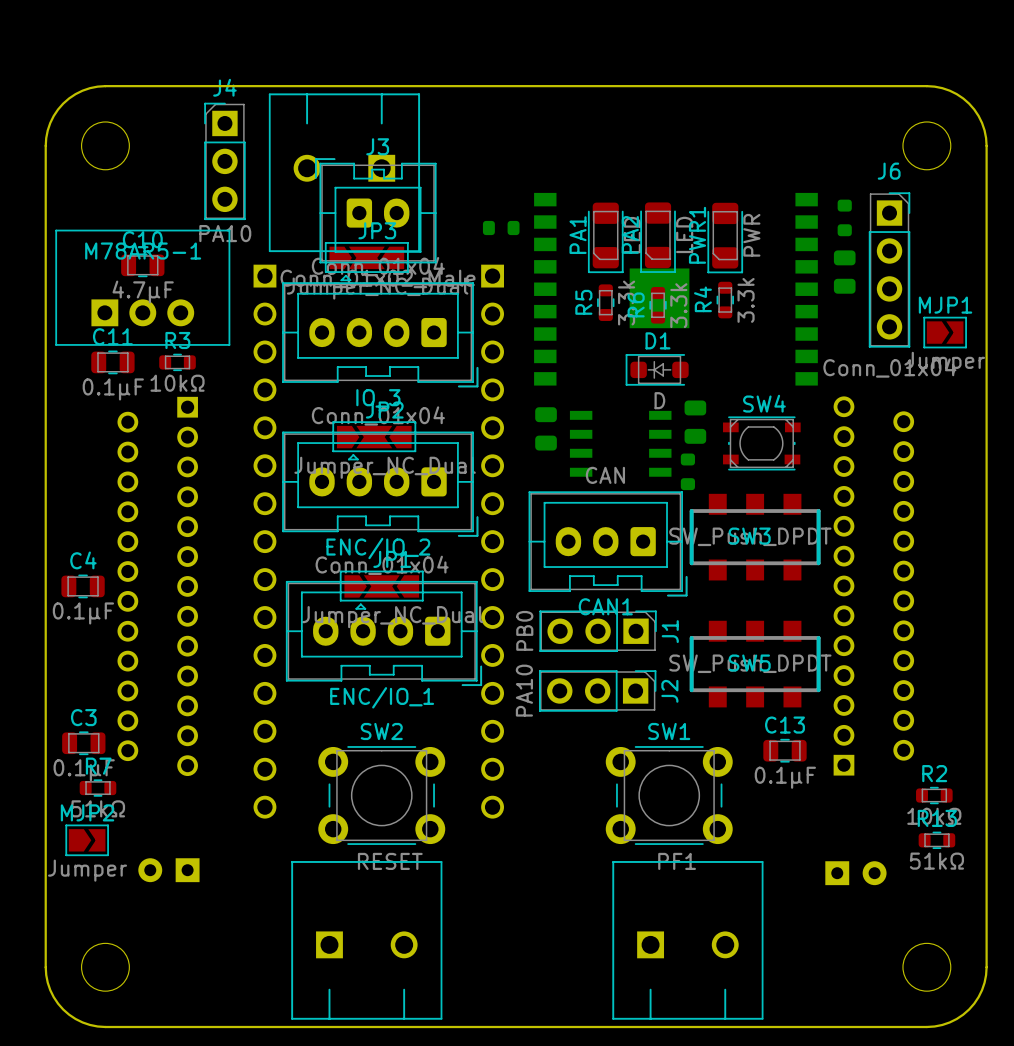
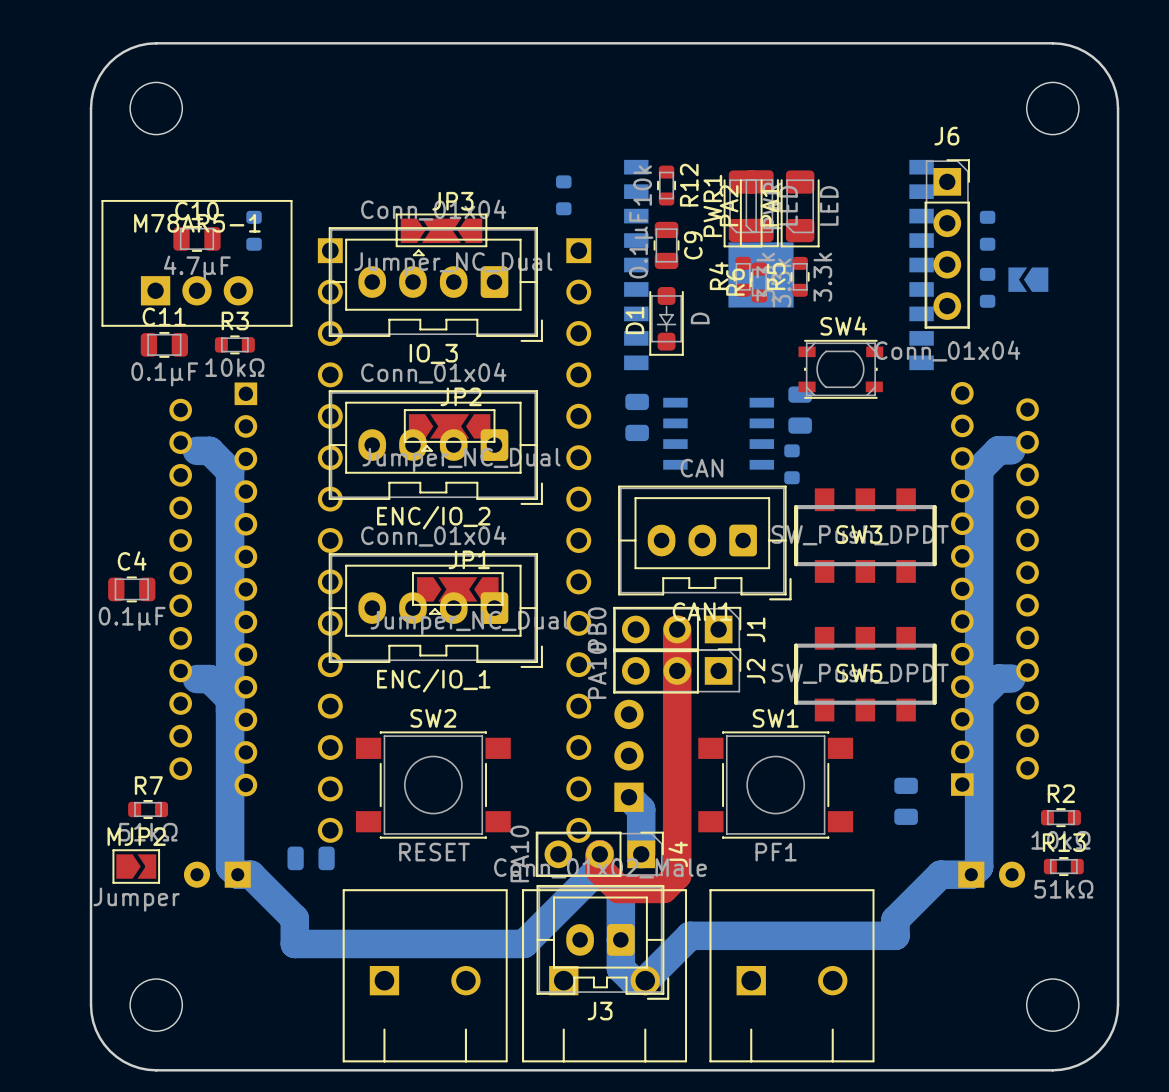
J4 rotation: 0° (224, 161) -> 90° clockwise (599, 854)
J4 position: (224, 161) -> (599, 854)
part: (344, 172) -> none
J3 rotation: 0° (375, 210) -> 180° (602, 942)
J3 position: (375, 210) -> (602, 942)
R12 side: bottom (844, 217) -> top (666, 185)
part rotation: 0° (501, 228) -> 90° clockwise (563, 195)
part position: (501, 228) -> (563, 195)
PA1 position: (605, 237) -> (800, 208)
PWR1 position: (725, 238) -> (743, 208)
part: none -> (254, 230)
part: none -> (987, 230)
J6 position: (889, 269) -> (947, 243)
C9 side: bottom (844, 272) -> top (666, 245)
R4 position: (725, 300) -> (743, 276)
R5 position: (605, 302) -> (800, 276)
part: none -> (987, 287)
MJP1 side: top (945, 332) -> bottom (1028, 279)
IO_3 position: (380, 334) -> (435, 284)
D1 rotation: 0° (657, 369) -> 90° counterclockwise (666, 321)
D1 position: (657, 369) -> (666, 321)
SW4 position: (761, 443) -> (840, 369)
bottom track: none -> (196, 450) (209, 450) (230, 471) (230, 867) (237, 874) (250, 874) (294, 918) (294, 943) (523, 943) (599, 868)
bottom track: none -> (1011, 450) (998, 450) (979, 469) (979, 866) (971, 874) (940, 874) (895, 919) (895, 935) (690, 935) (645, 980) (633, 980) (620, 968) (620, 891) (599, 870) (599, 854)
ENC/IO_2 position: (380, 484) -> (435, 447)
top track: none -> (677, 629) (677, 875) (663, 888) (618, 888) (599, 870) (599, 854)
J1 position: (598, 631) -> (677, 629)
ENC/IO_1 position: (383, 633) -> (435, 610)
bottom track: none -> (196, 679) (209, 679) (230, 699)
bottom track: none -> (1011, 678) (998, 678) (979, 697)
J2 position: (597, 690) -> (677, 670)
part: none -> (628, 755)
C3 side: top (83, 743) -> bottom (311, 858)
SW2 footprint: [318, 746, 446, 845] -> [355, 731, 511, 839]
SW1 footprint: [605, 746, 733, 845] -> [698, 731, 854, 839]
C13 side: top (784, 750) -> bottom (906, 801)
bottom track: none -> (628, 797) (641, 809) (641, 854)
part position: (168, 870) -> (217, 874)
part position: (855, 873) -> (991, 874)
part position: (366, 940) -> (425, 975)
part: none -> (604, 975)

